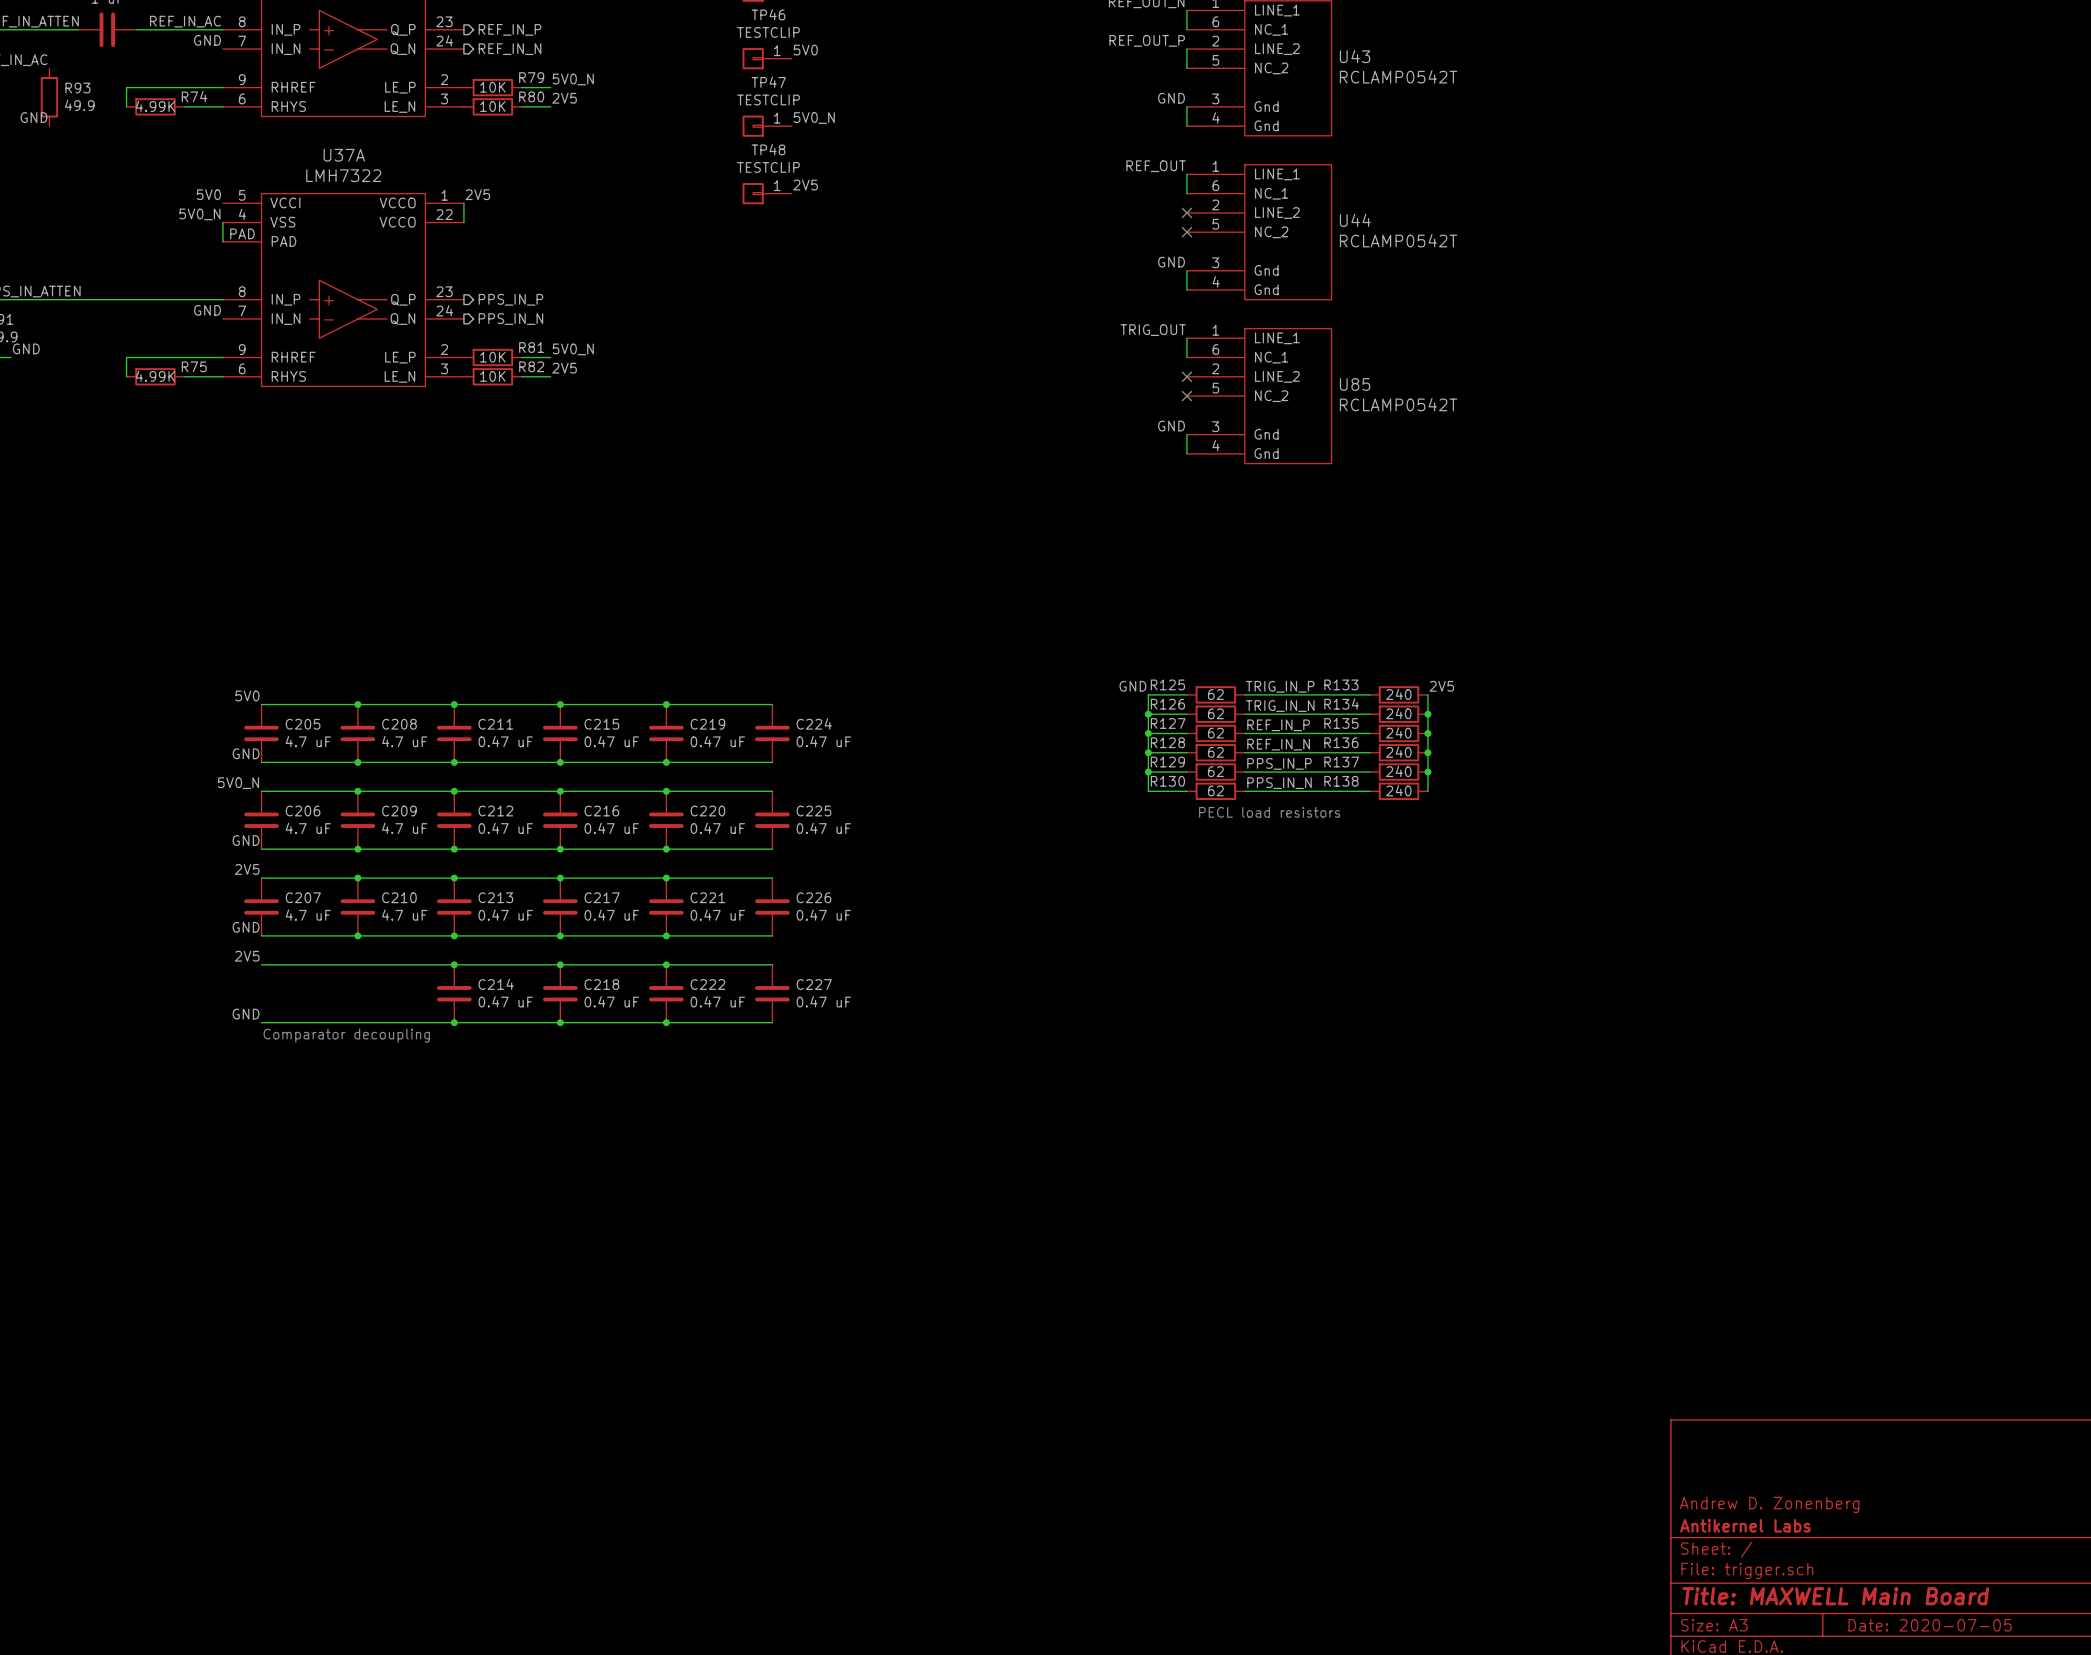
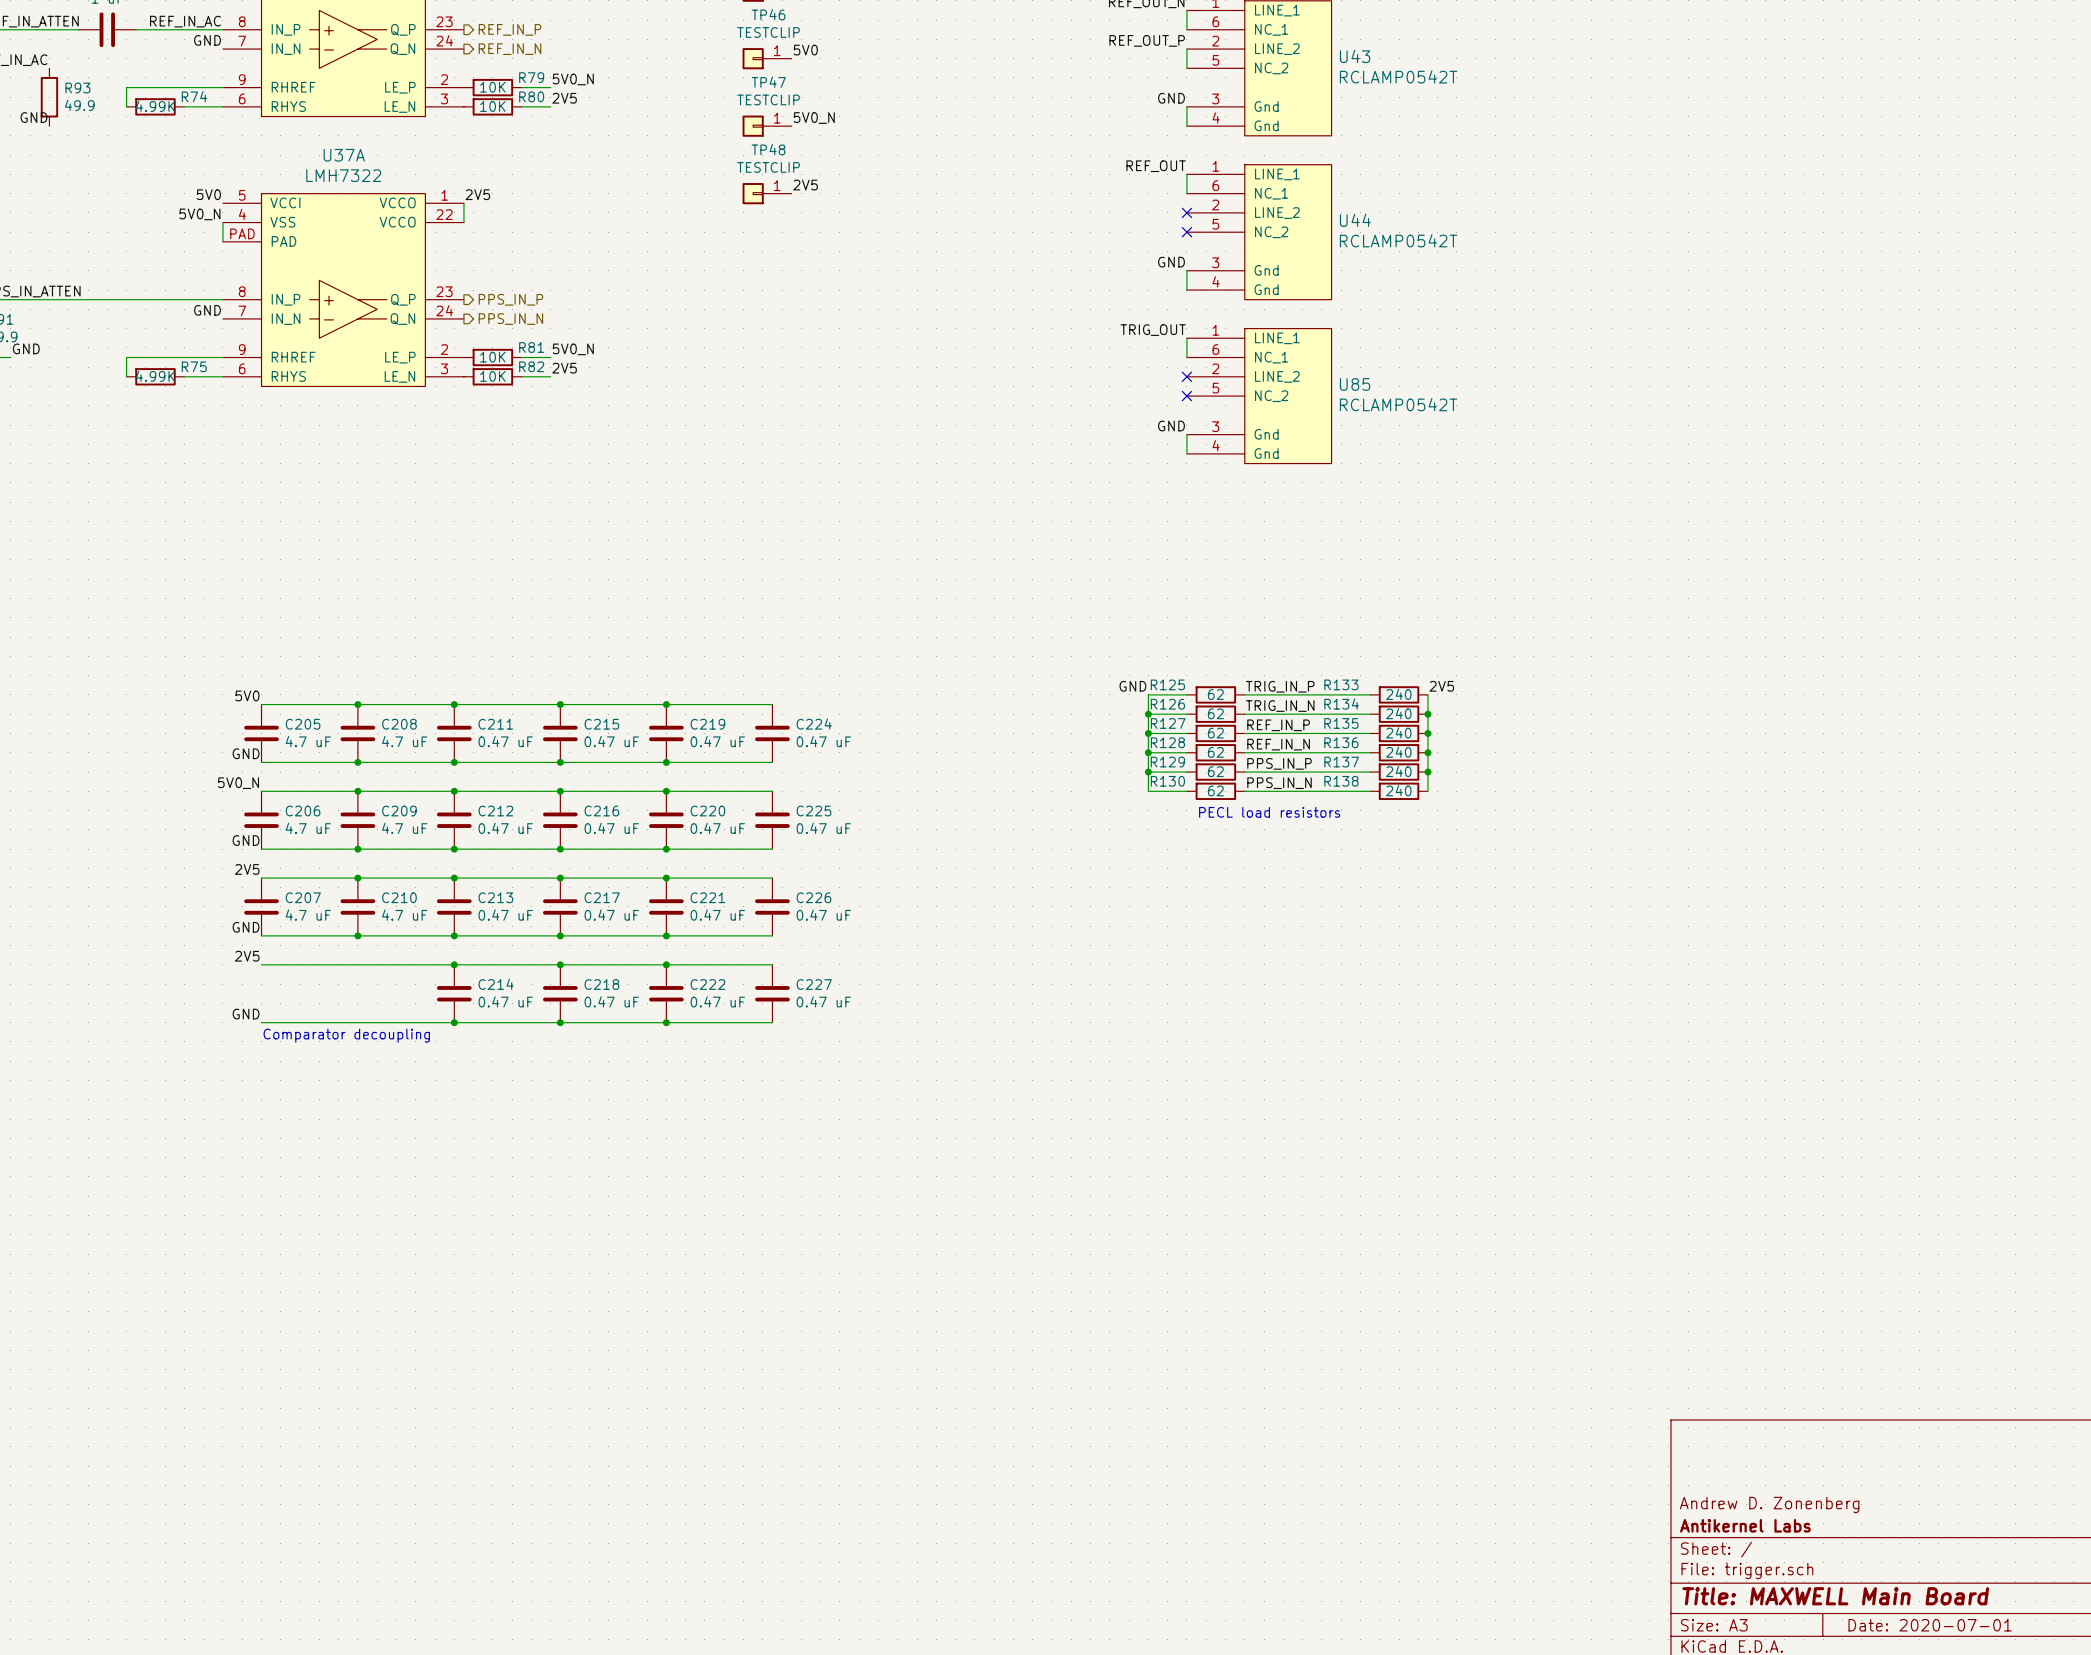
title block: Date: 2020-07-05 (1930, 1625) -> Date: 2020-07-01 (1930, 1625)

